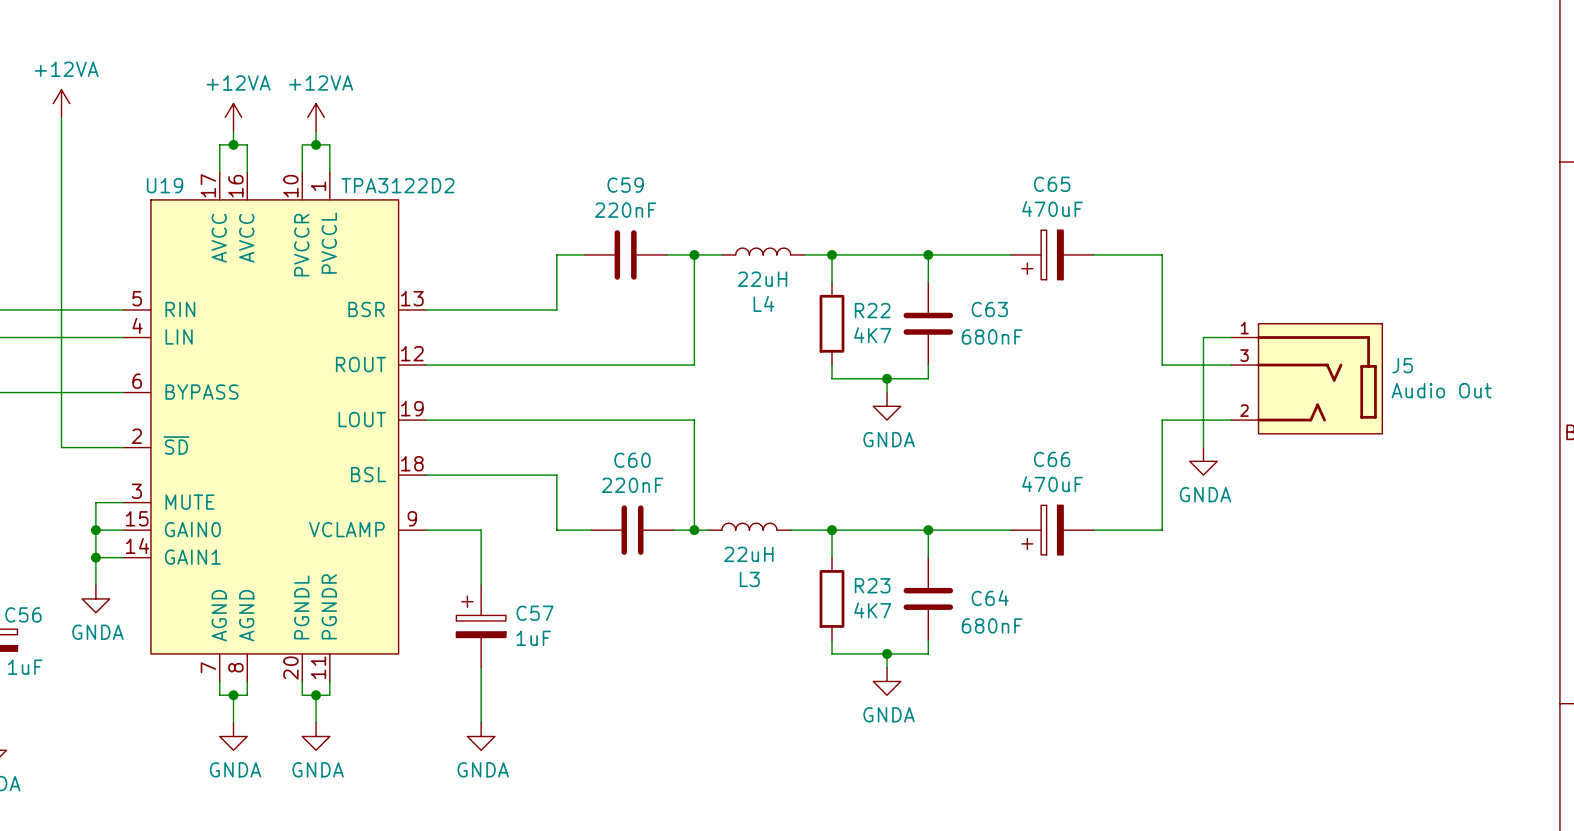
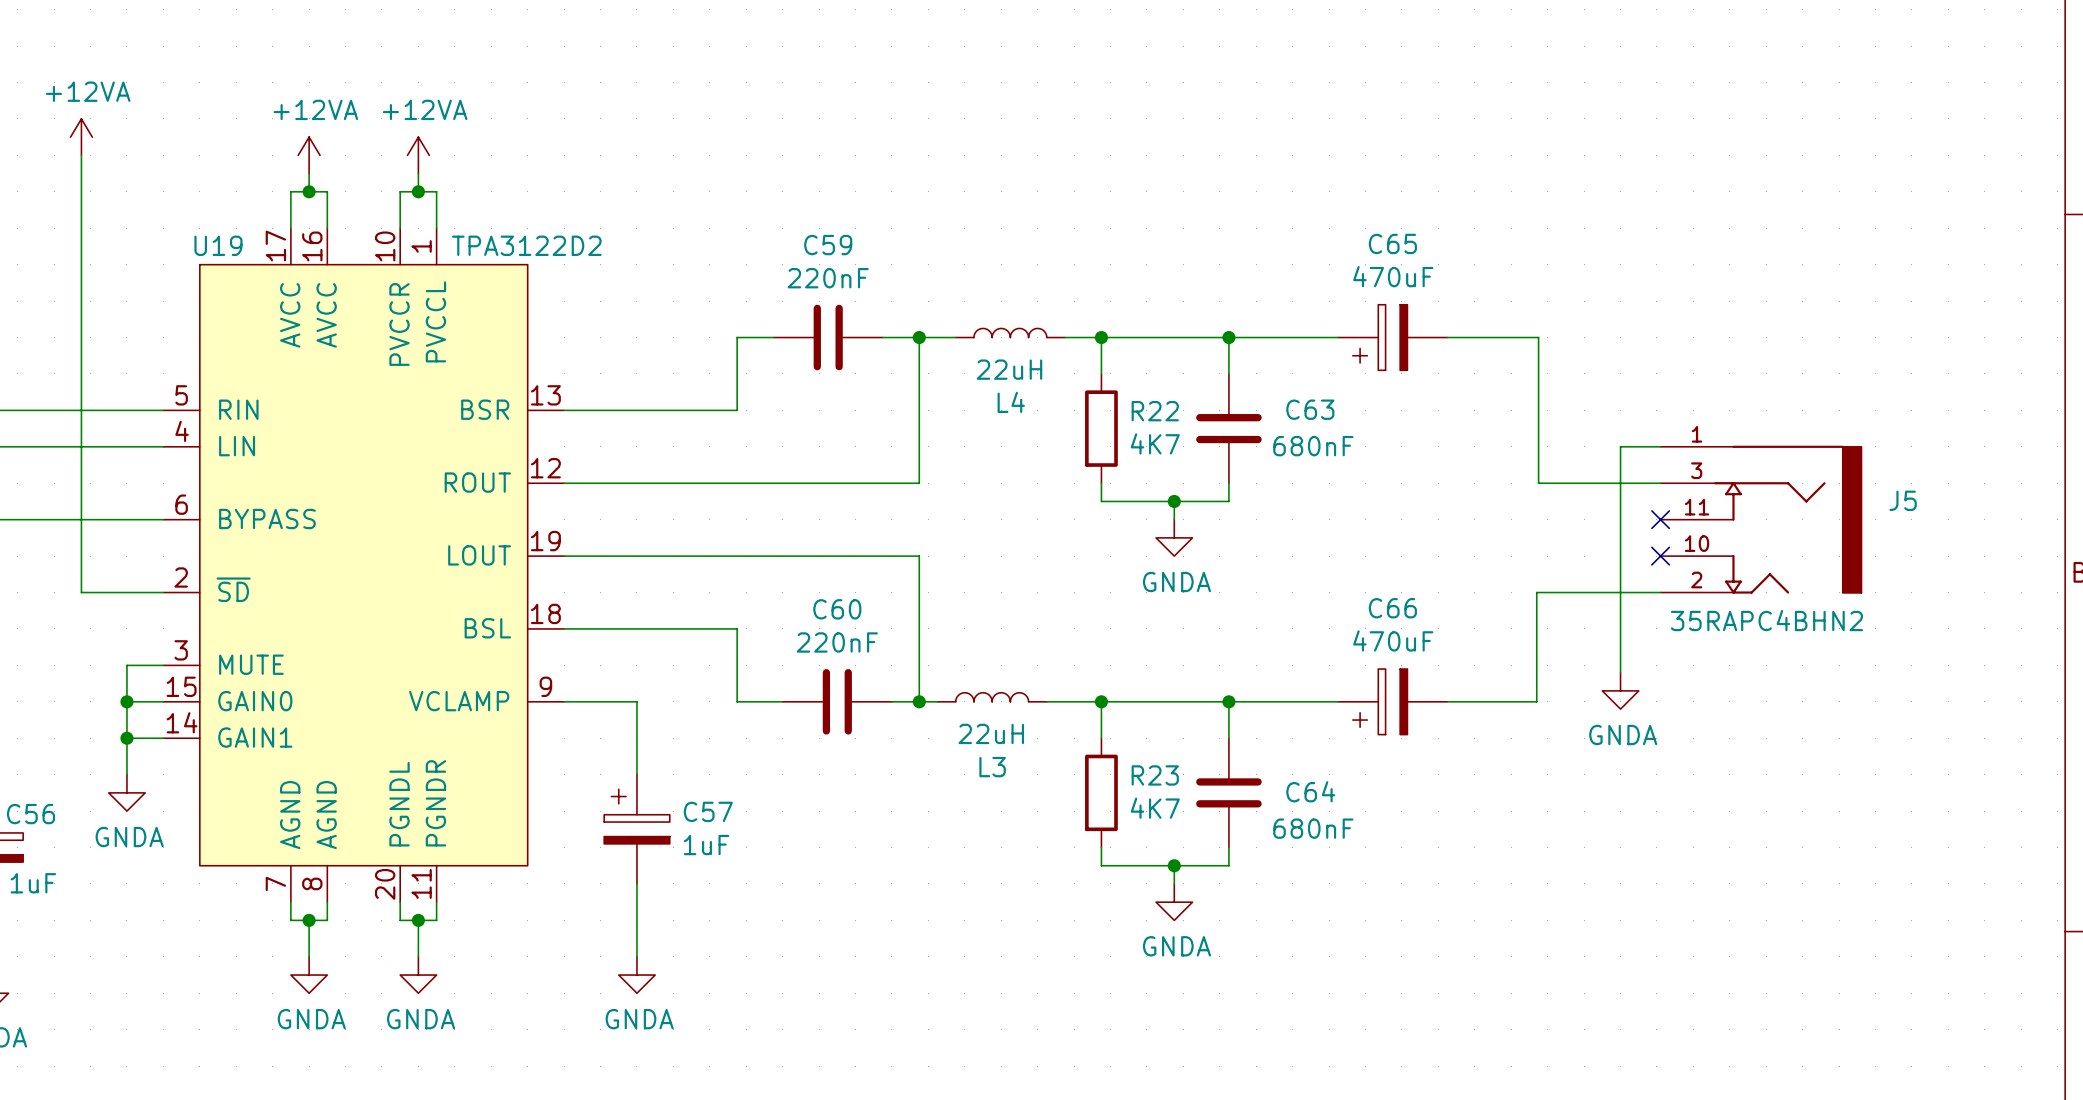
J5 symbol: [1230, 323, 1383, 434] -> [1660, 445, 1863, 594]
wire: (1224, 337) (1203, 337) (1203, 447) -> (1620, 446) (1620, 672)
J5 value: Audio Out (1441, 390) -> 35RAPC4BHN2 (1766, 620)
no-connect mark: none -> (1660, 519)
wire: (1230, 420) (1162, 420) (1160, 530) -> (1660, 592) (1536, 592) (1536, 701)
no-connect mark: none -> (1660, 556)
power symbol position: GNDA (1203, 461) -> GNDA (1620, 690)

